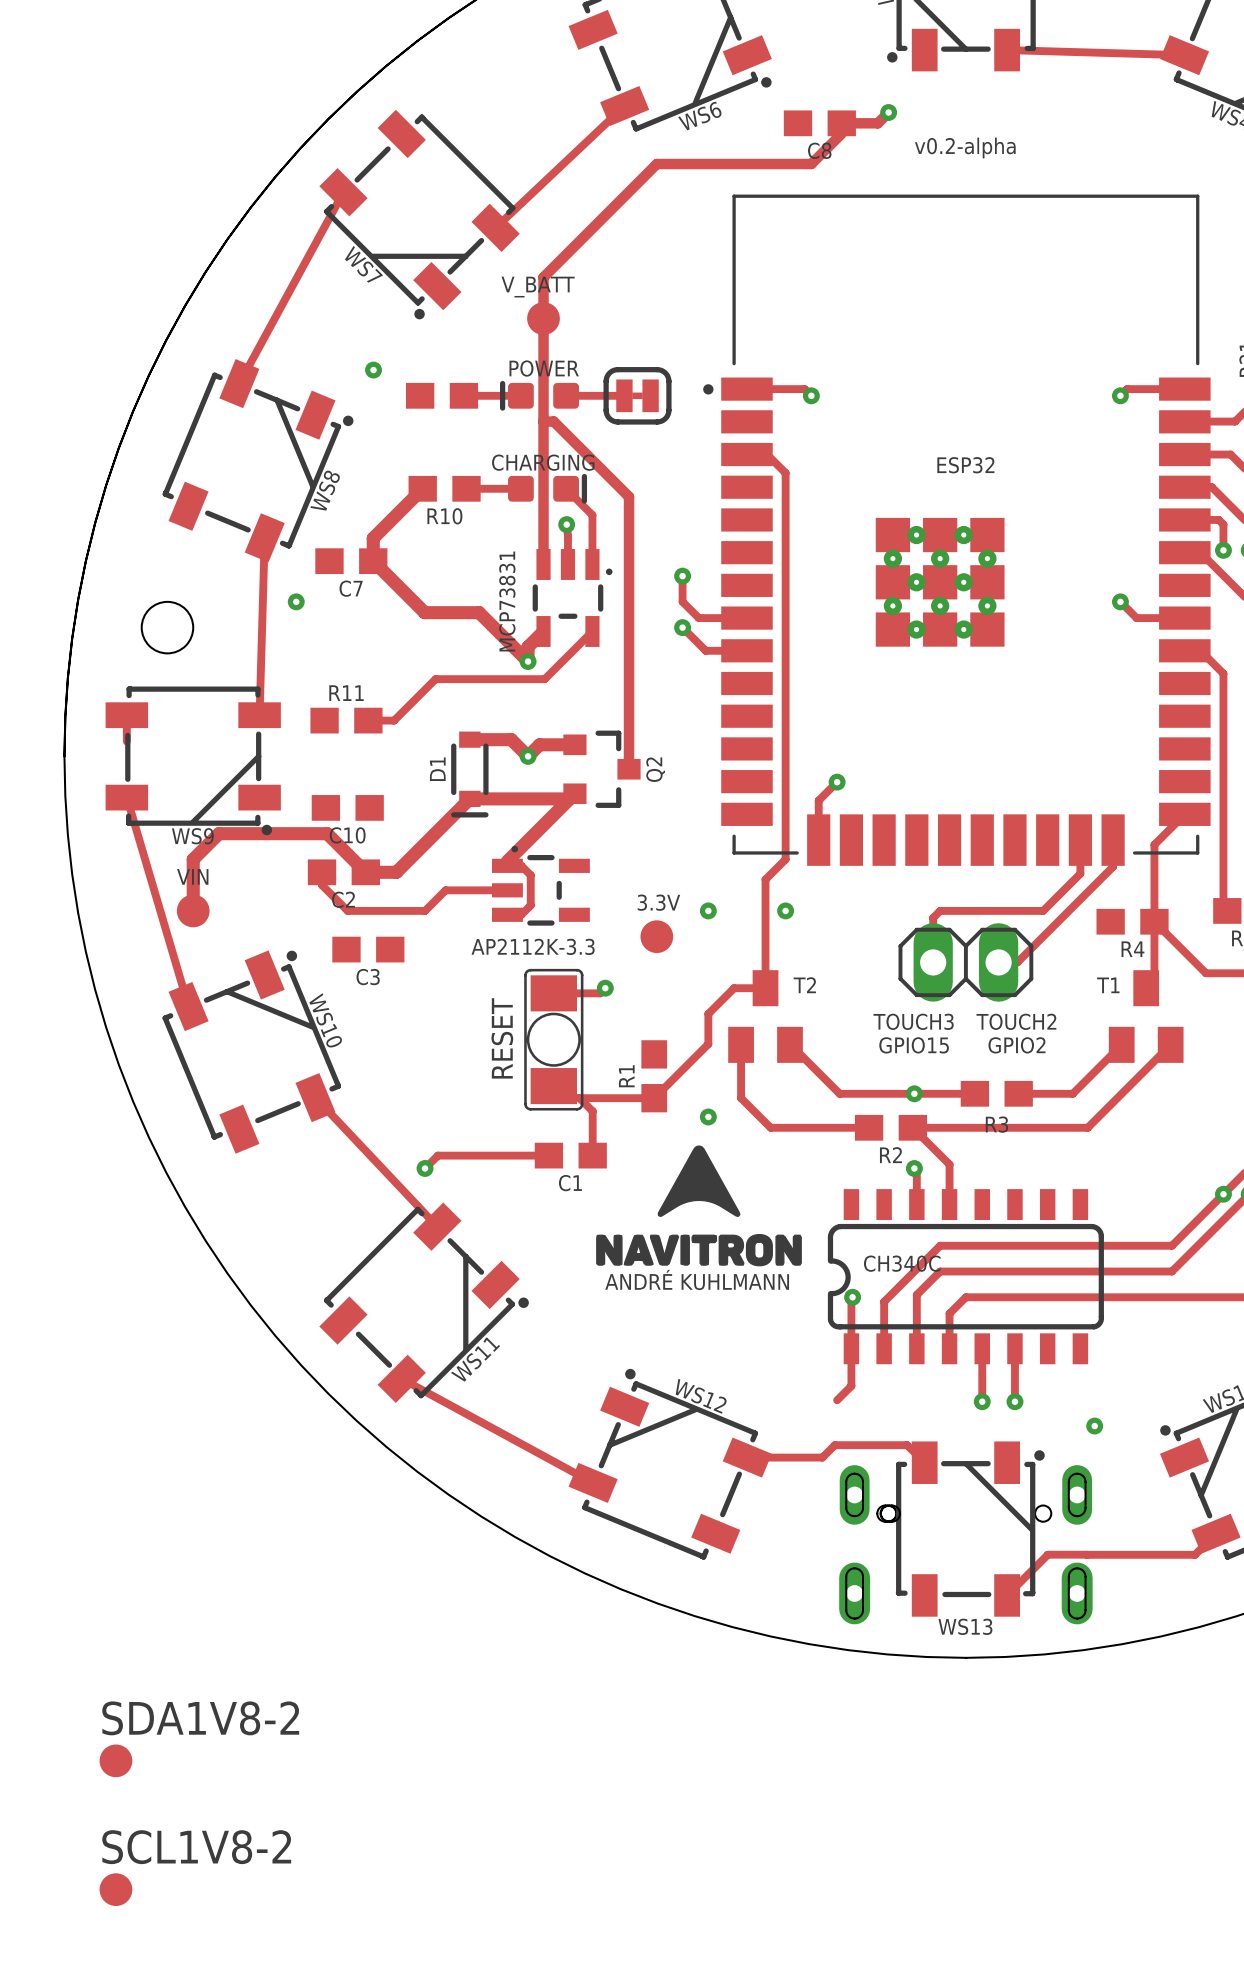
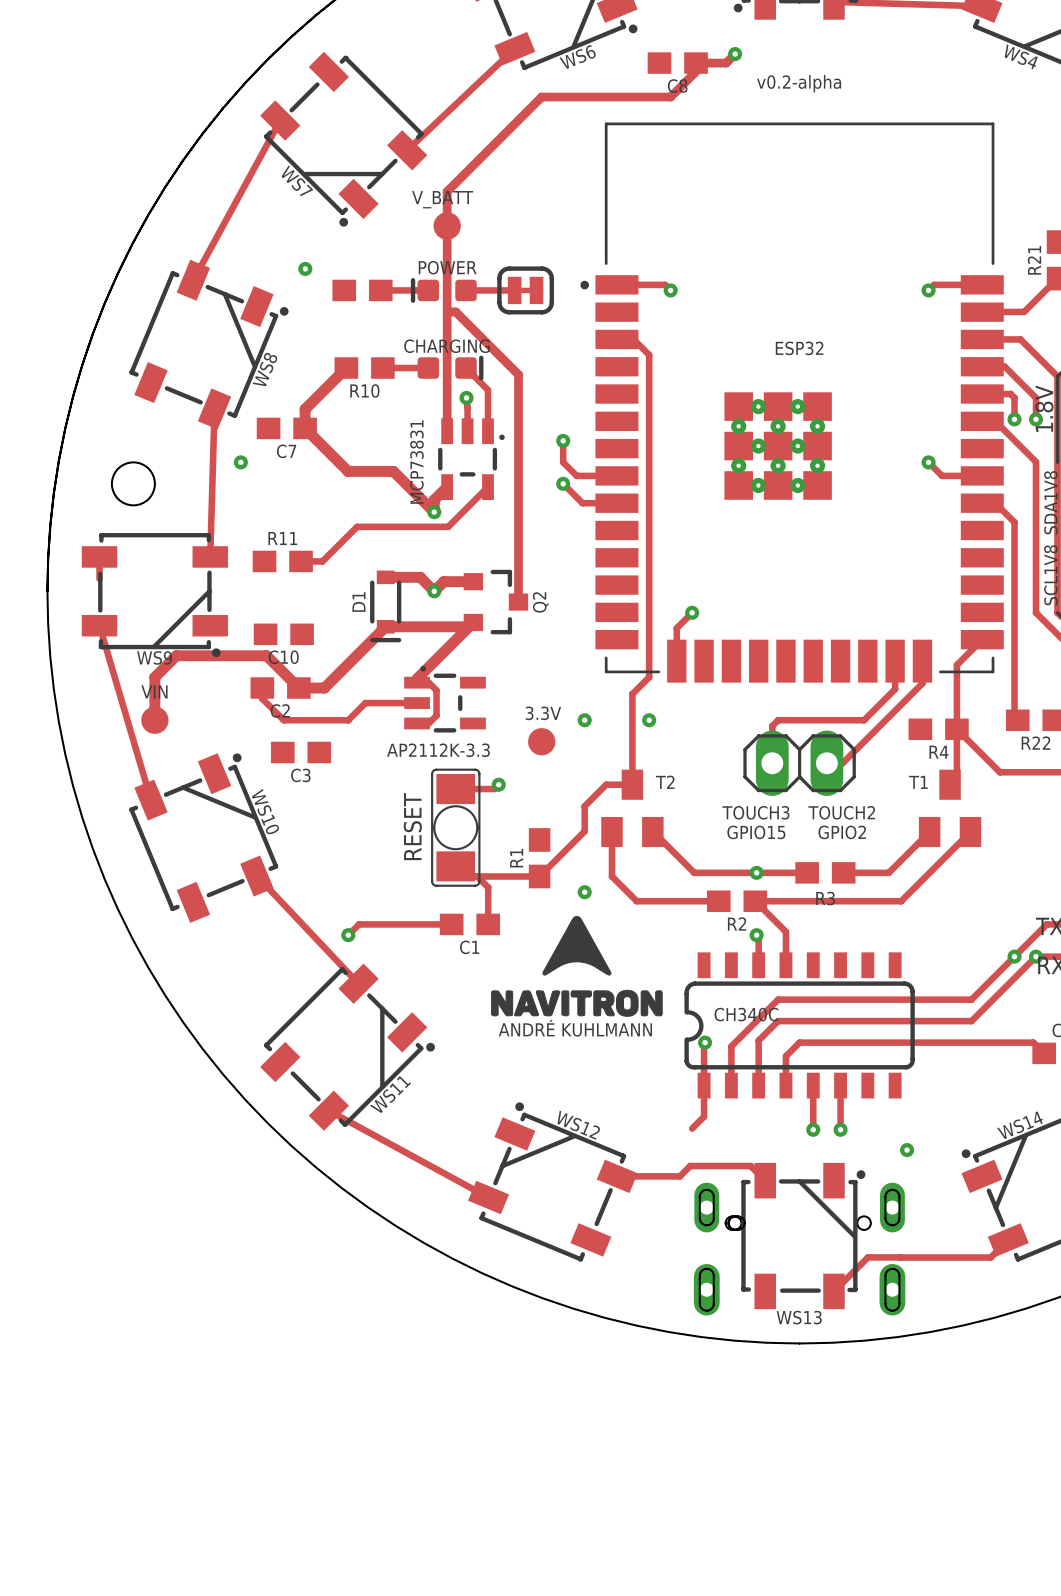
SDA1V8-2: (115, 1760) -> none
SCL1V8-2: (115, 1889) -> none

